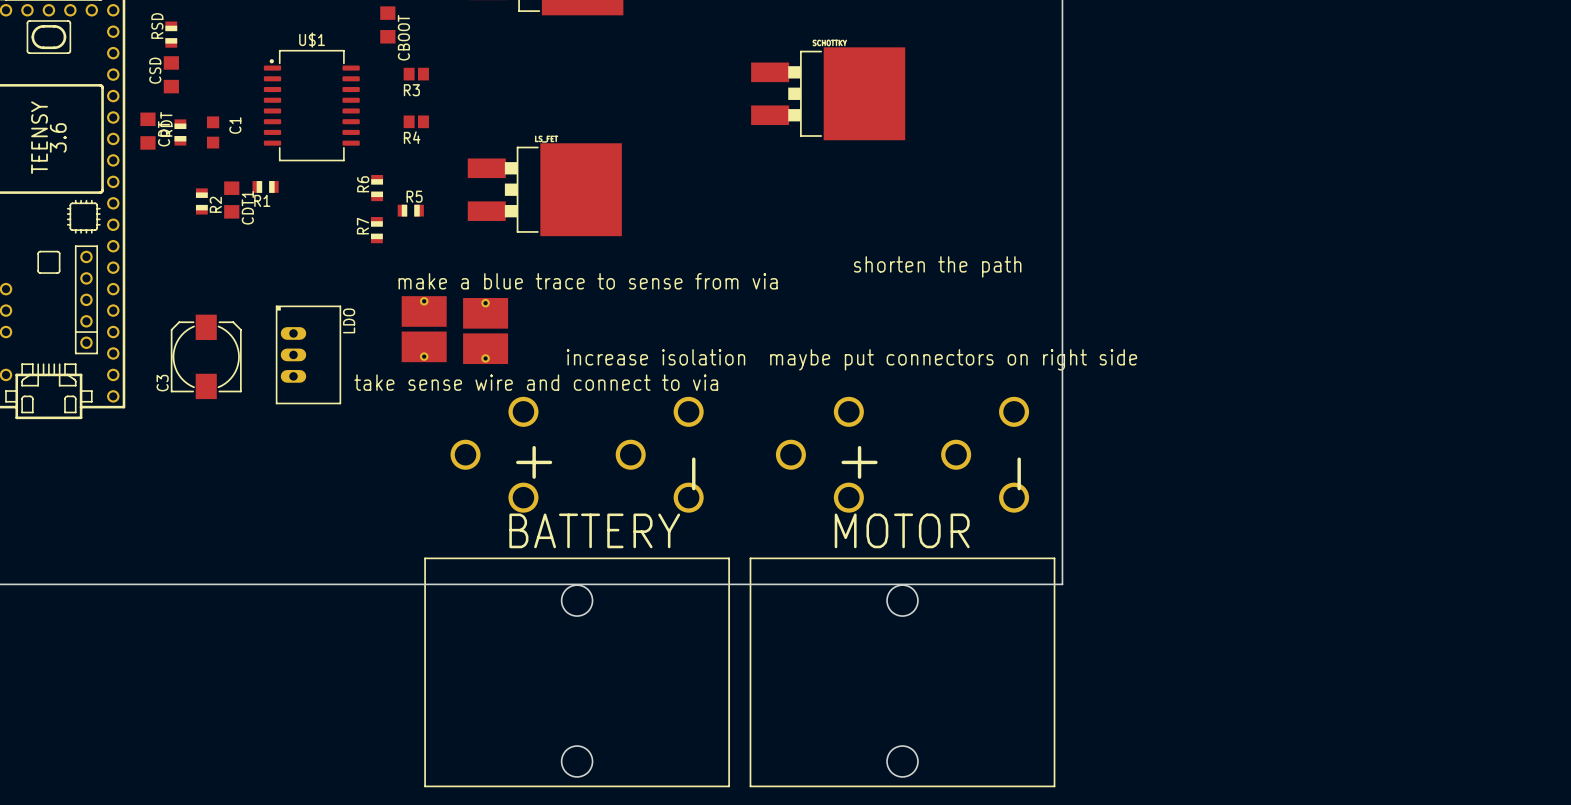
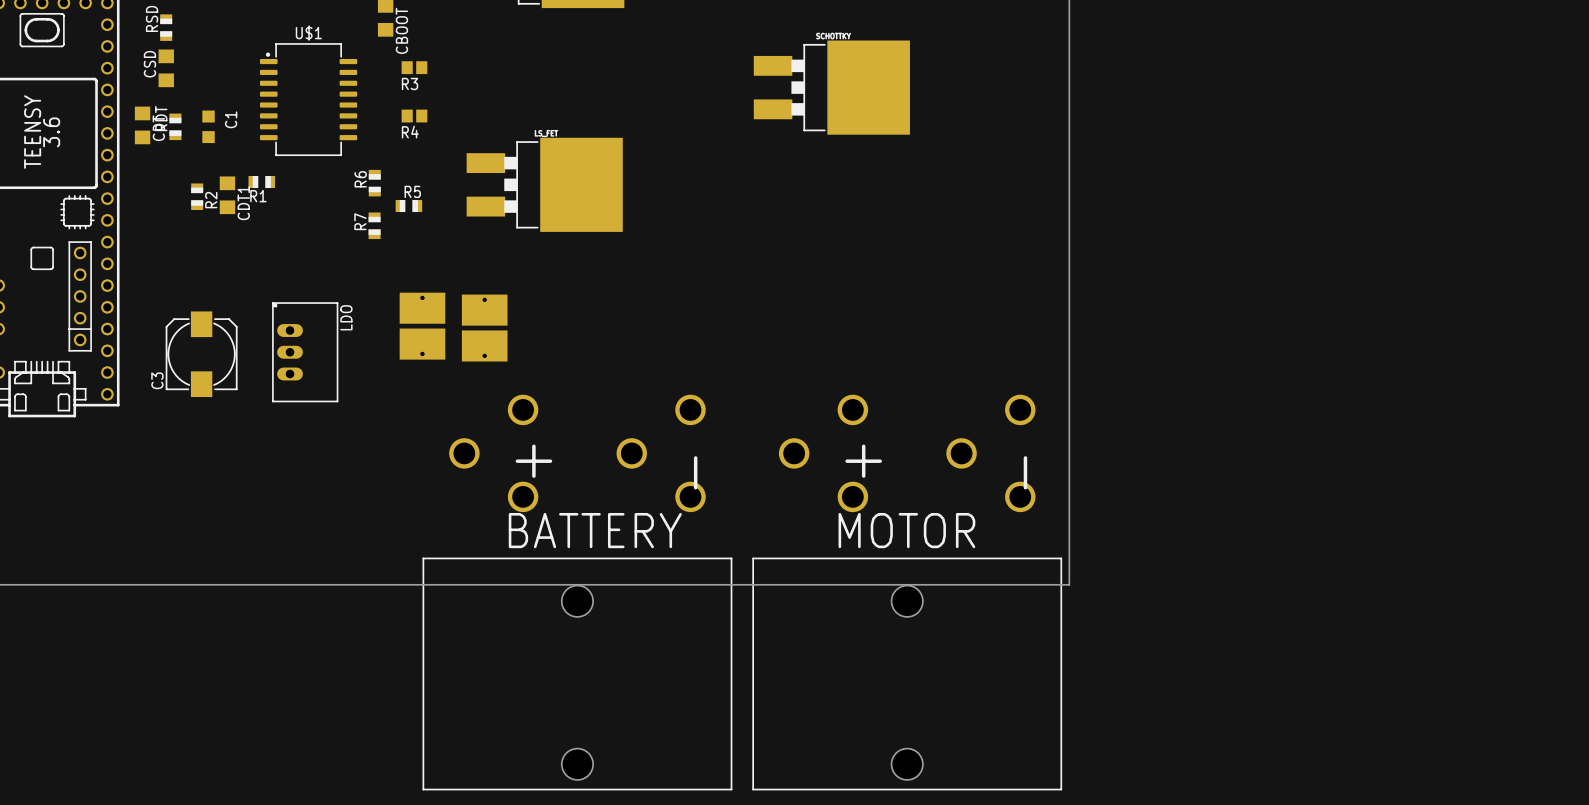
text: shorten the path (937, 266) -> none
text: make a blue trace to sense from via (588, 281) -> none
text: increase isolation (656, 357) -> none
text: maybe put connectors on right side (953, 359) -> none
text: take sense wire and connect to via (536, 382) -> none

